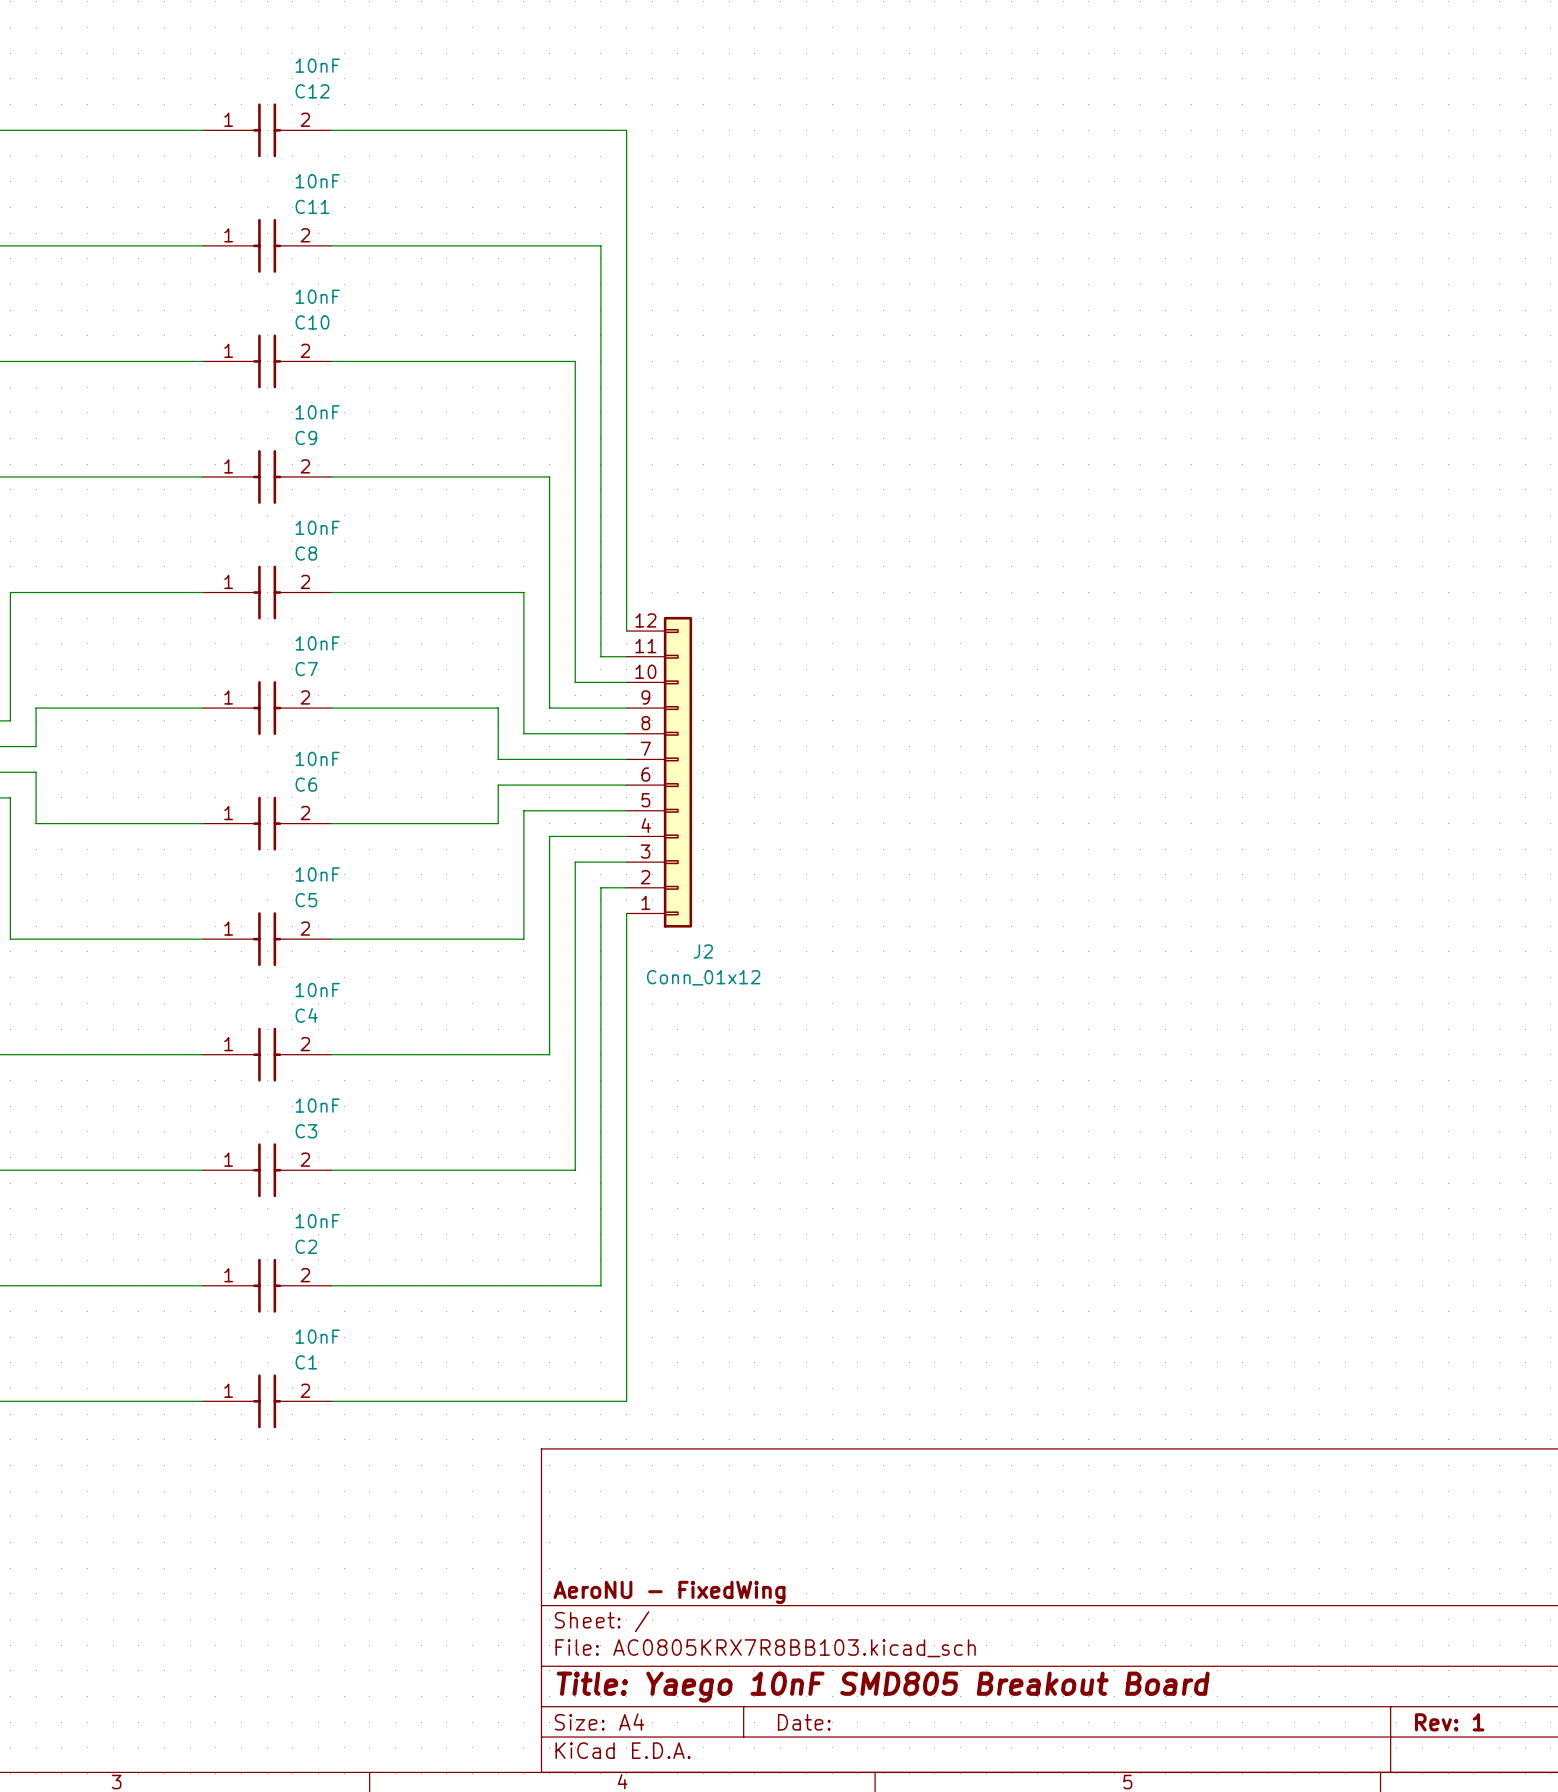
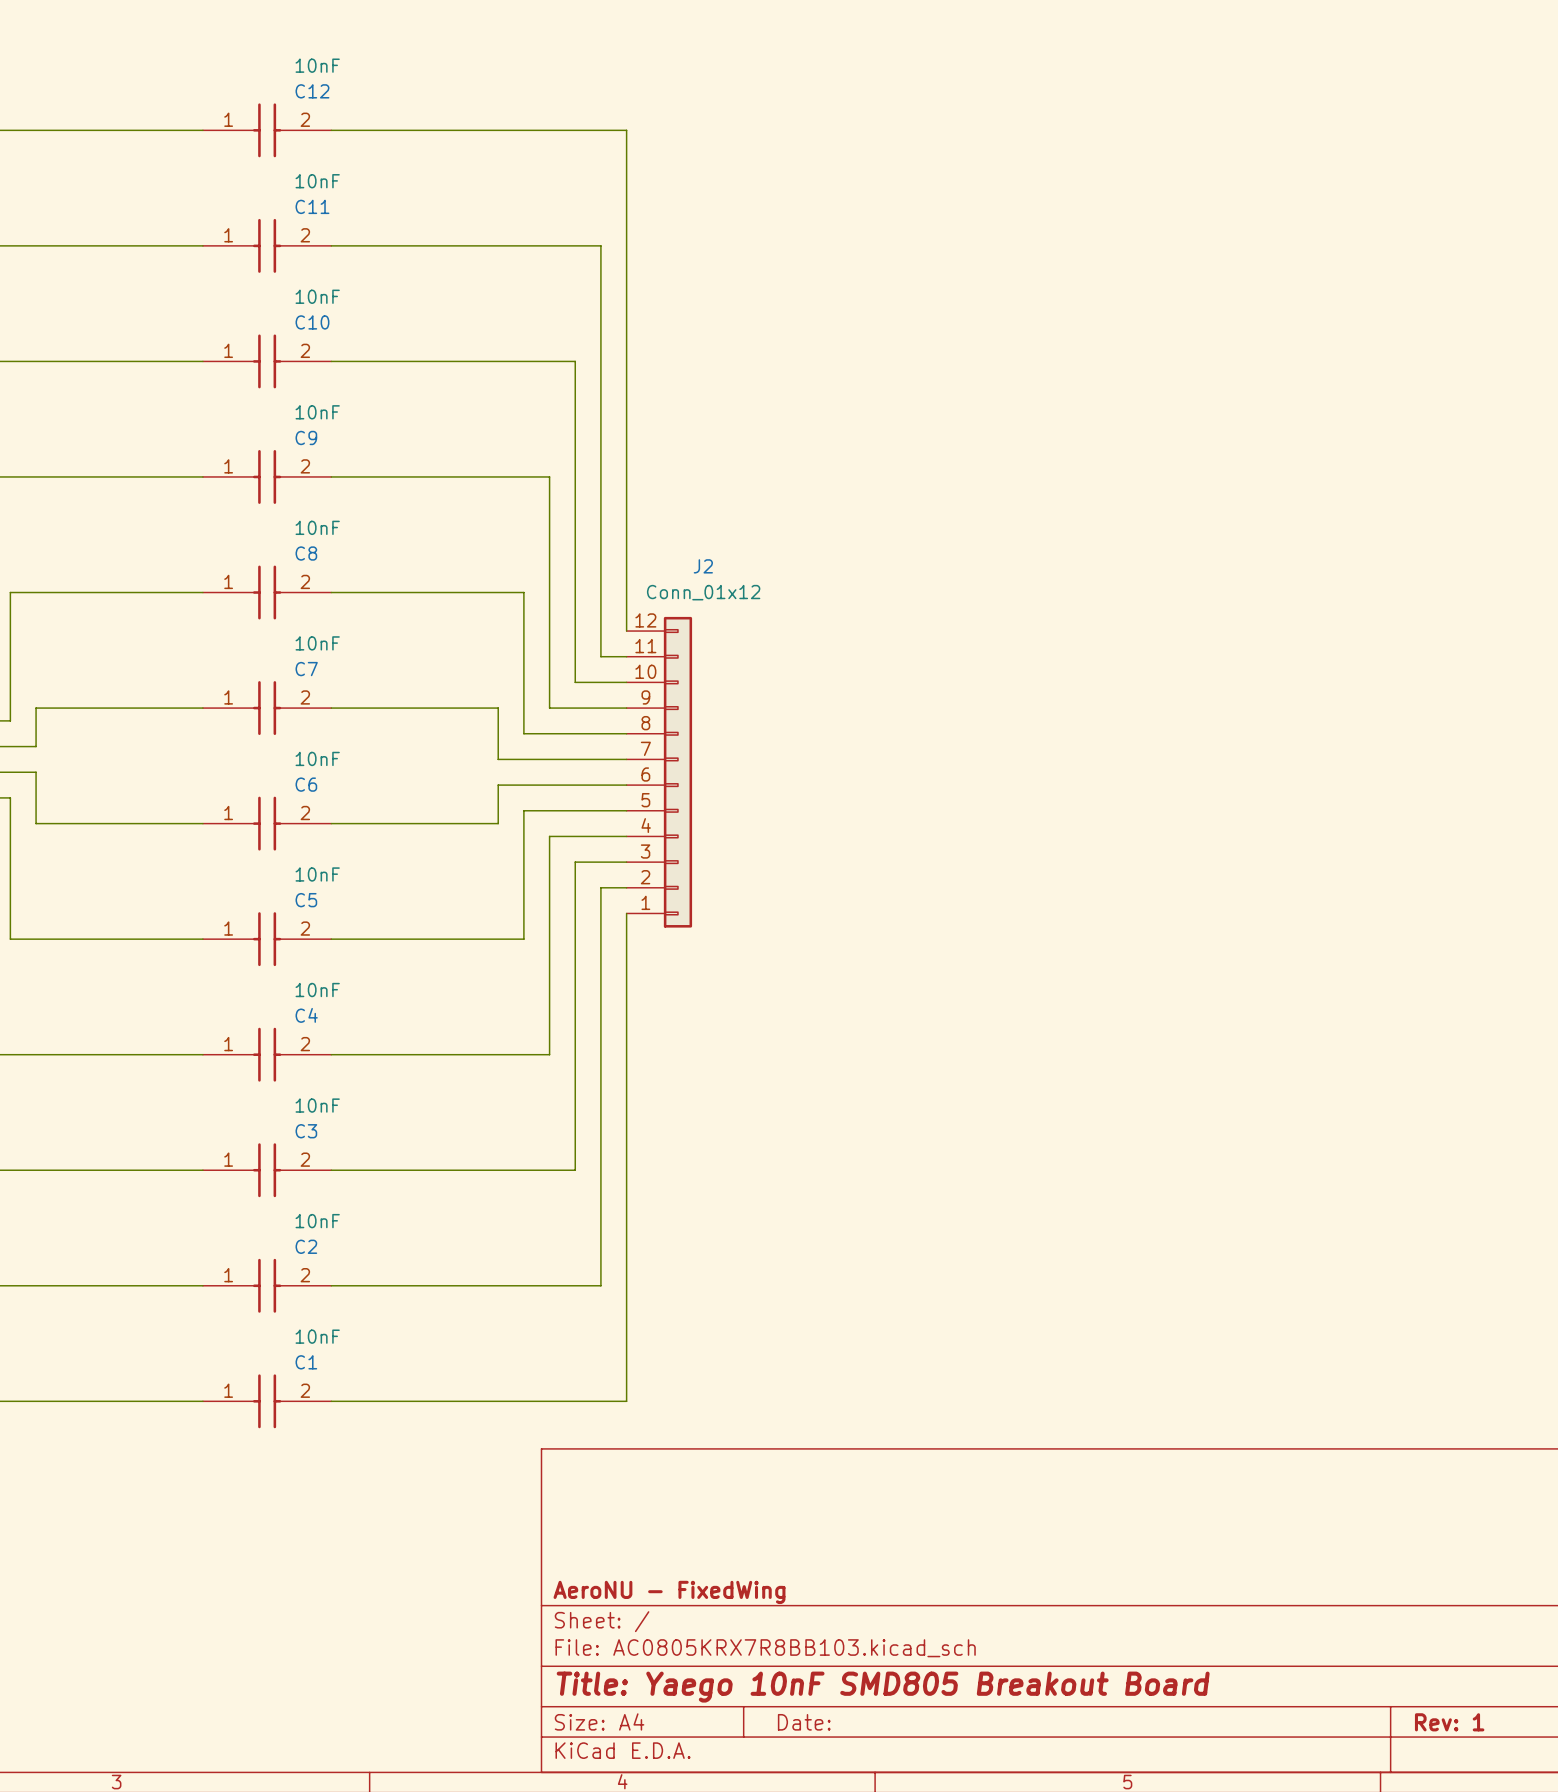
J2 name position: J2 (703, 951) -> J2 (703, 566)
J2 value position: Conn_01x12 (703, 977) -> Conn_01x12 (703, 592)

